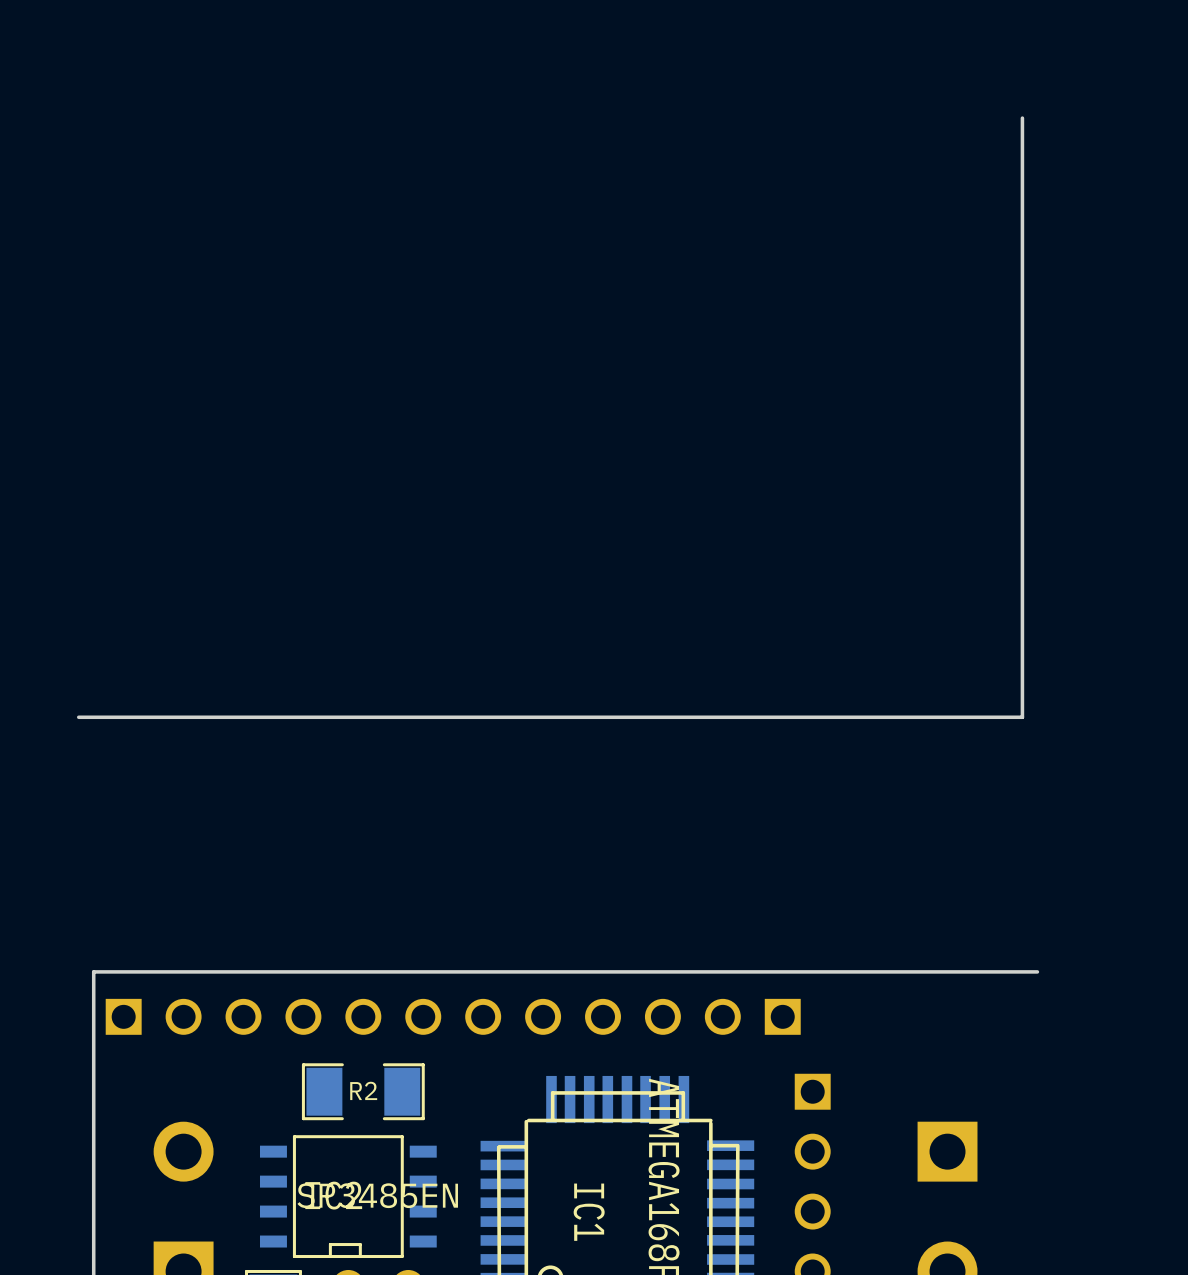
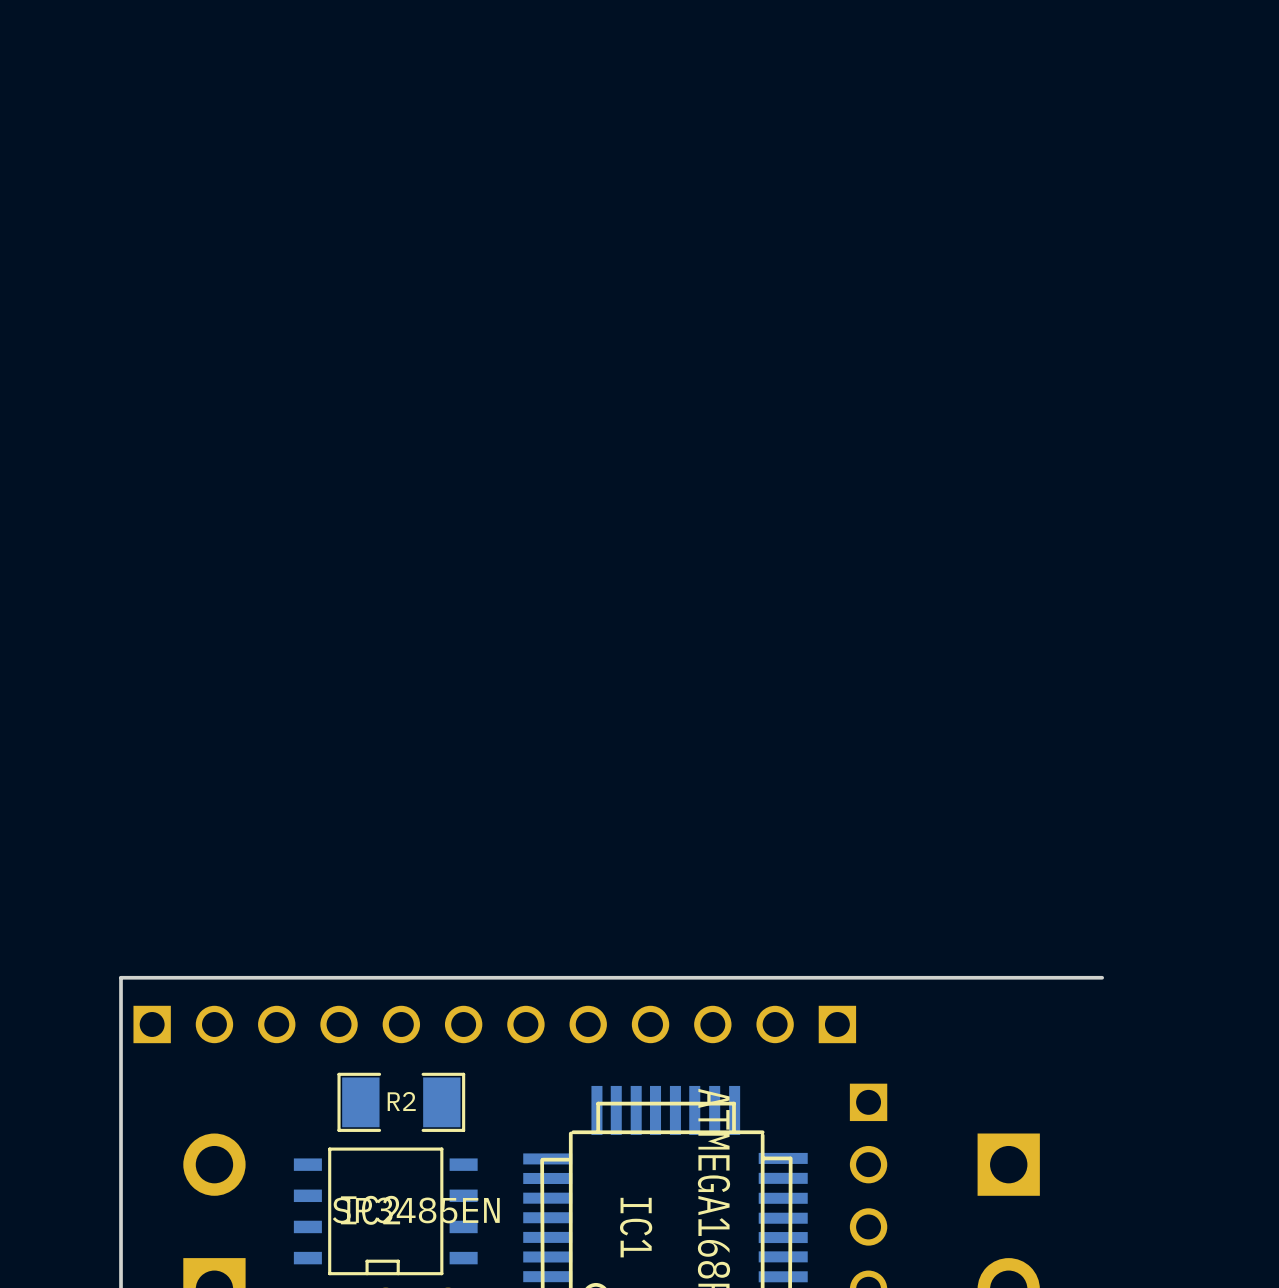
board edge: (1022, 118) (1022, 717) (78, 717) -> none

